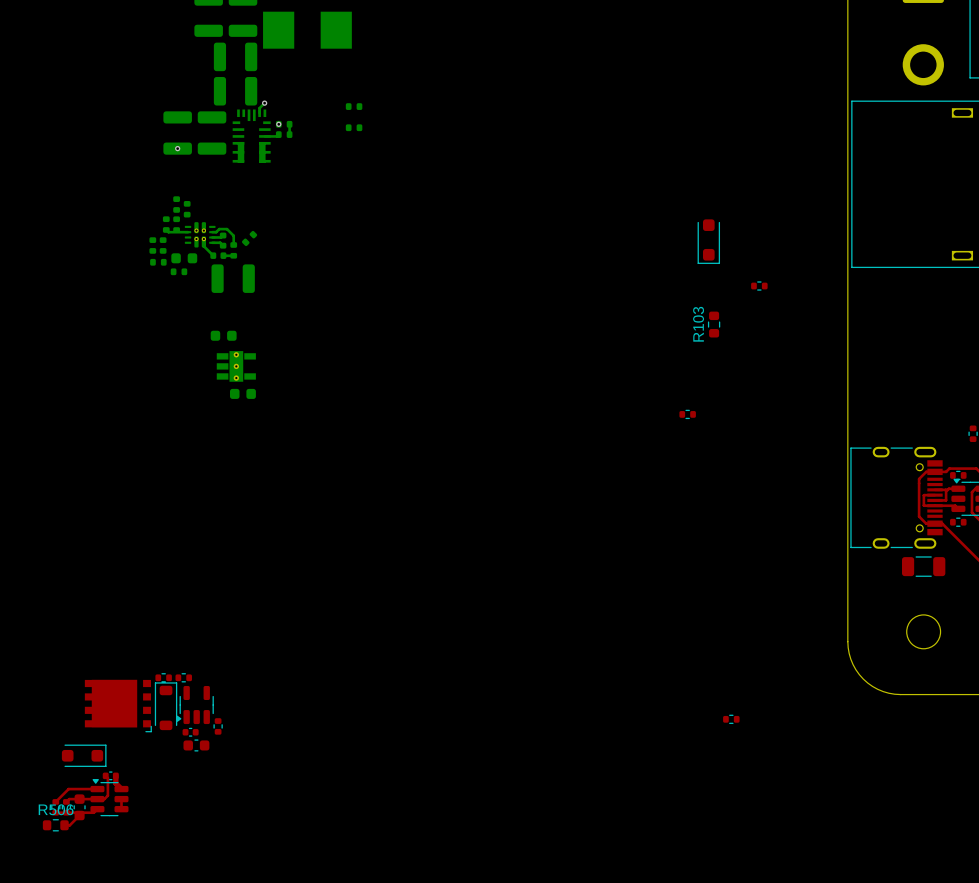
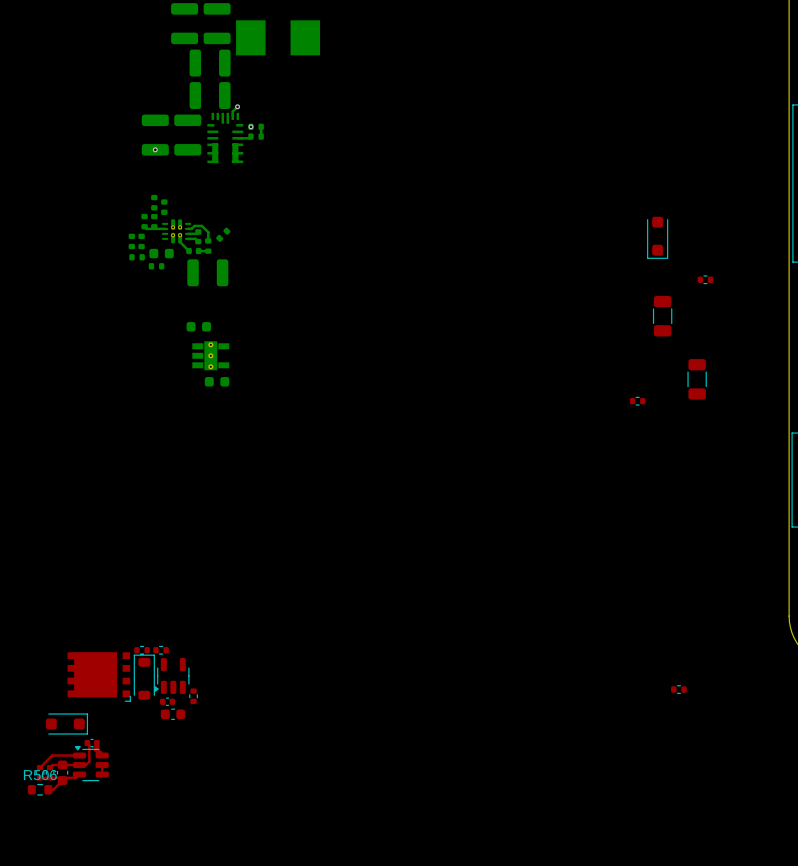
part: (354, 106) -> none
part: (354, 127) -> none
R103: (714, 324) -> none
part: none -> (662, 316)
part: none -> (697, 379)

